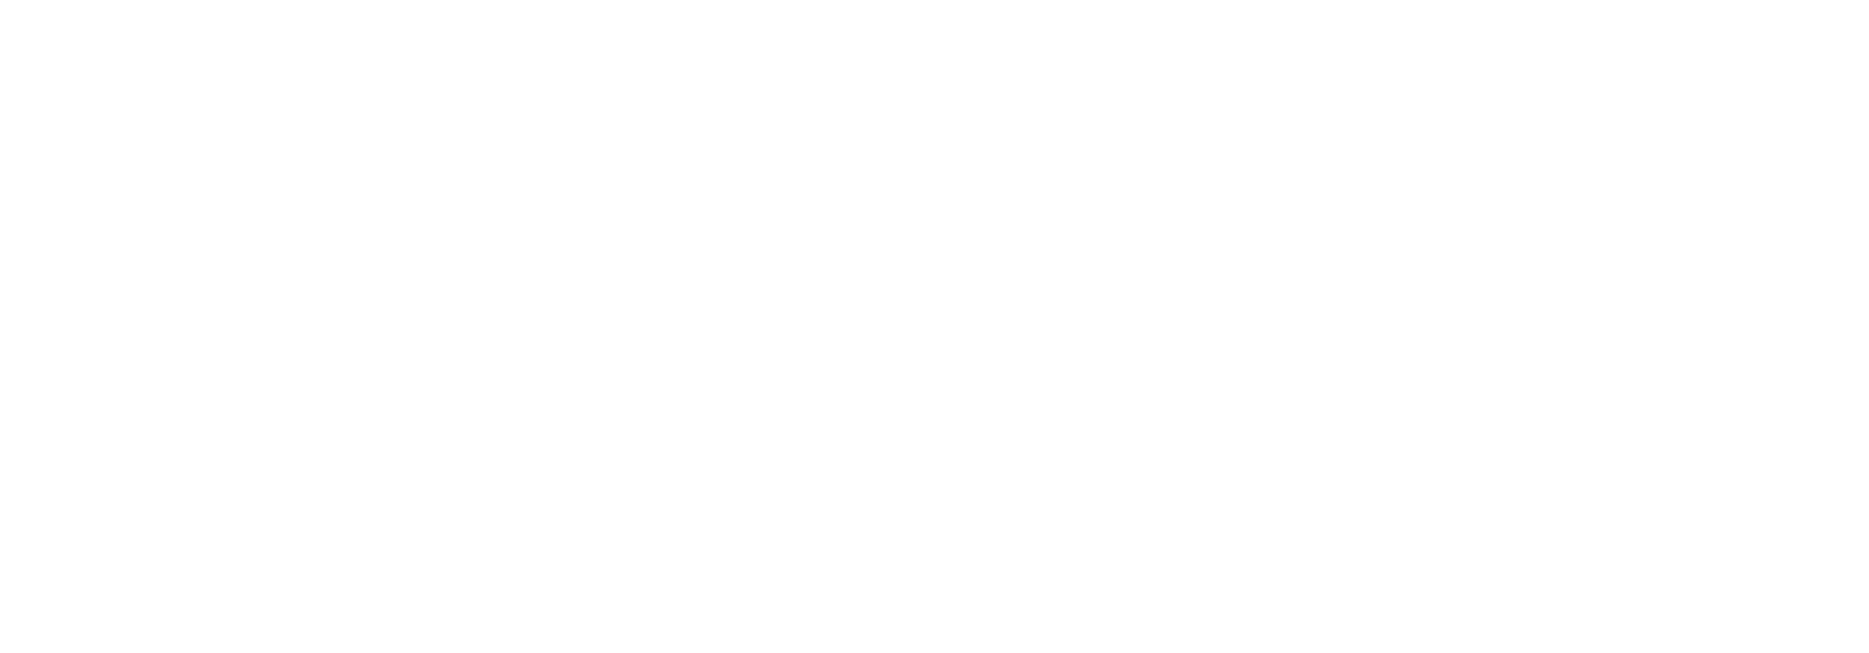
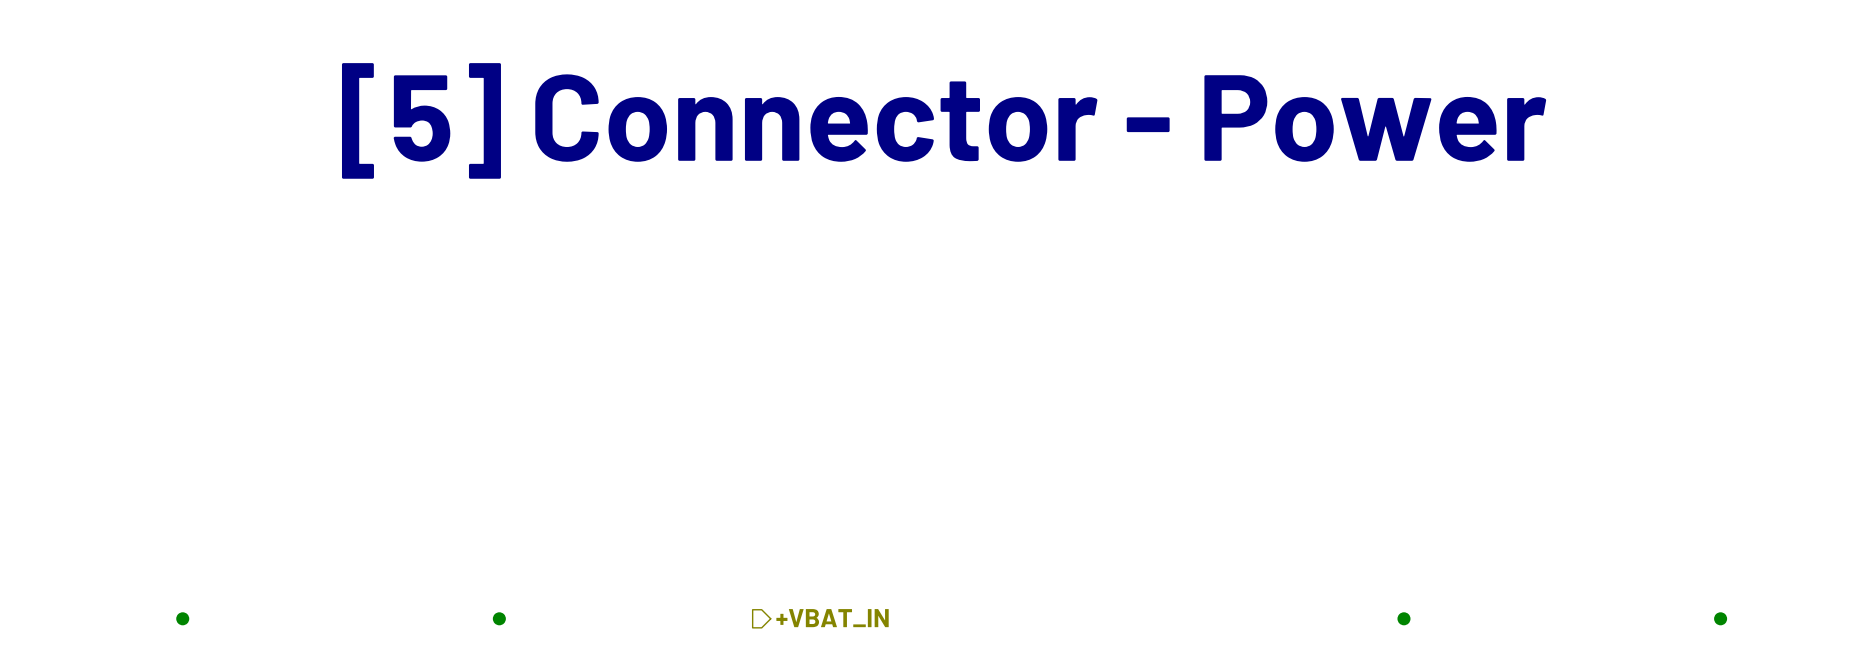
text: none -> [5] Connector - Power (944, 120)
junction: none -> (182, 618)
junction: none -> (499, 618)
hierarchical label: none -> +VBAT_IN (832, 618)
junction: none -> (1403, 618)
junction: none -> (1720, 618)

